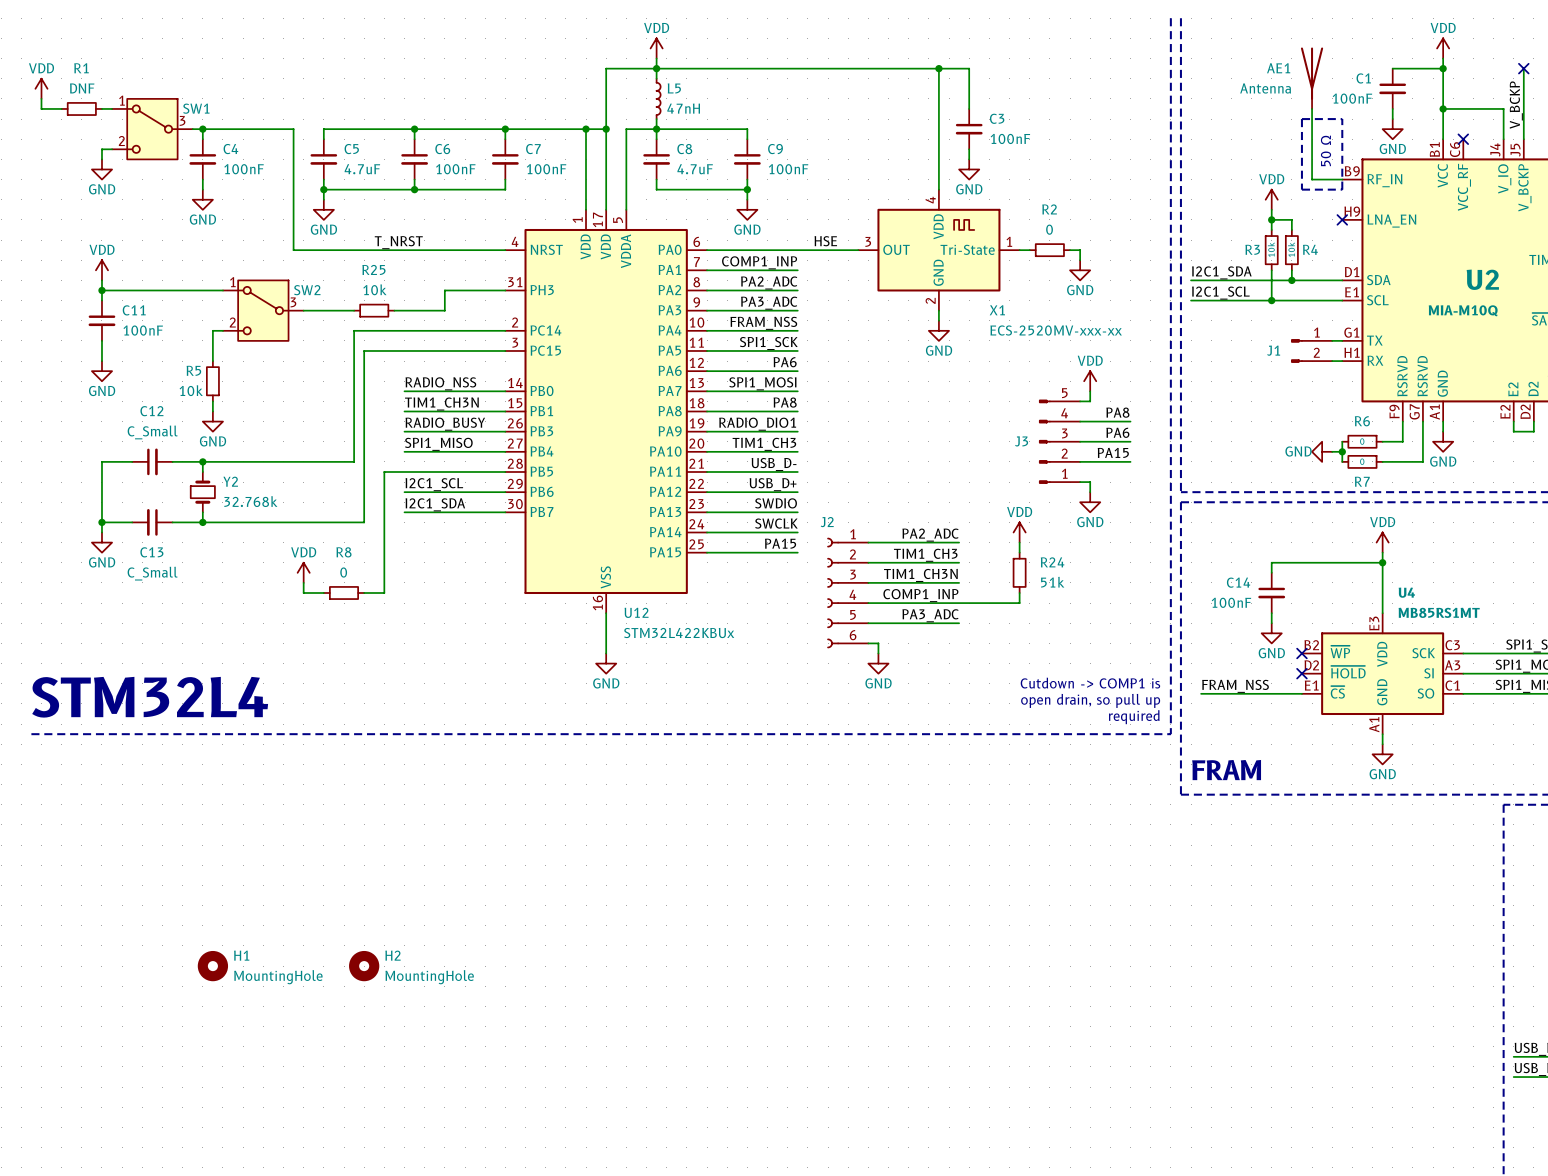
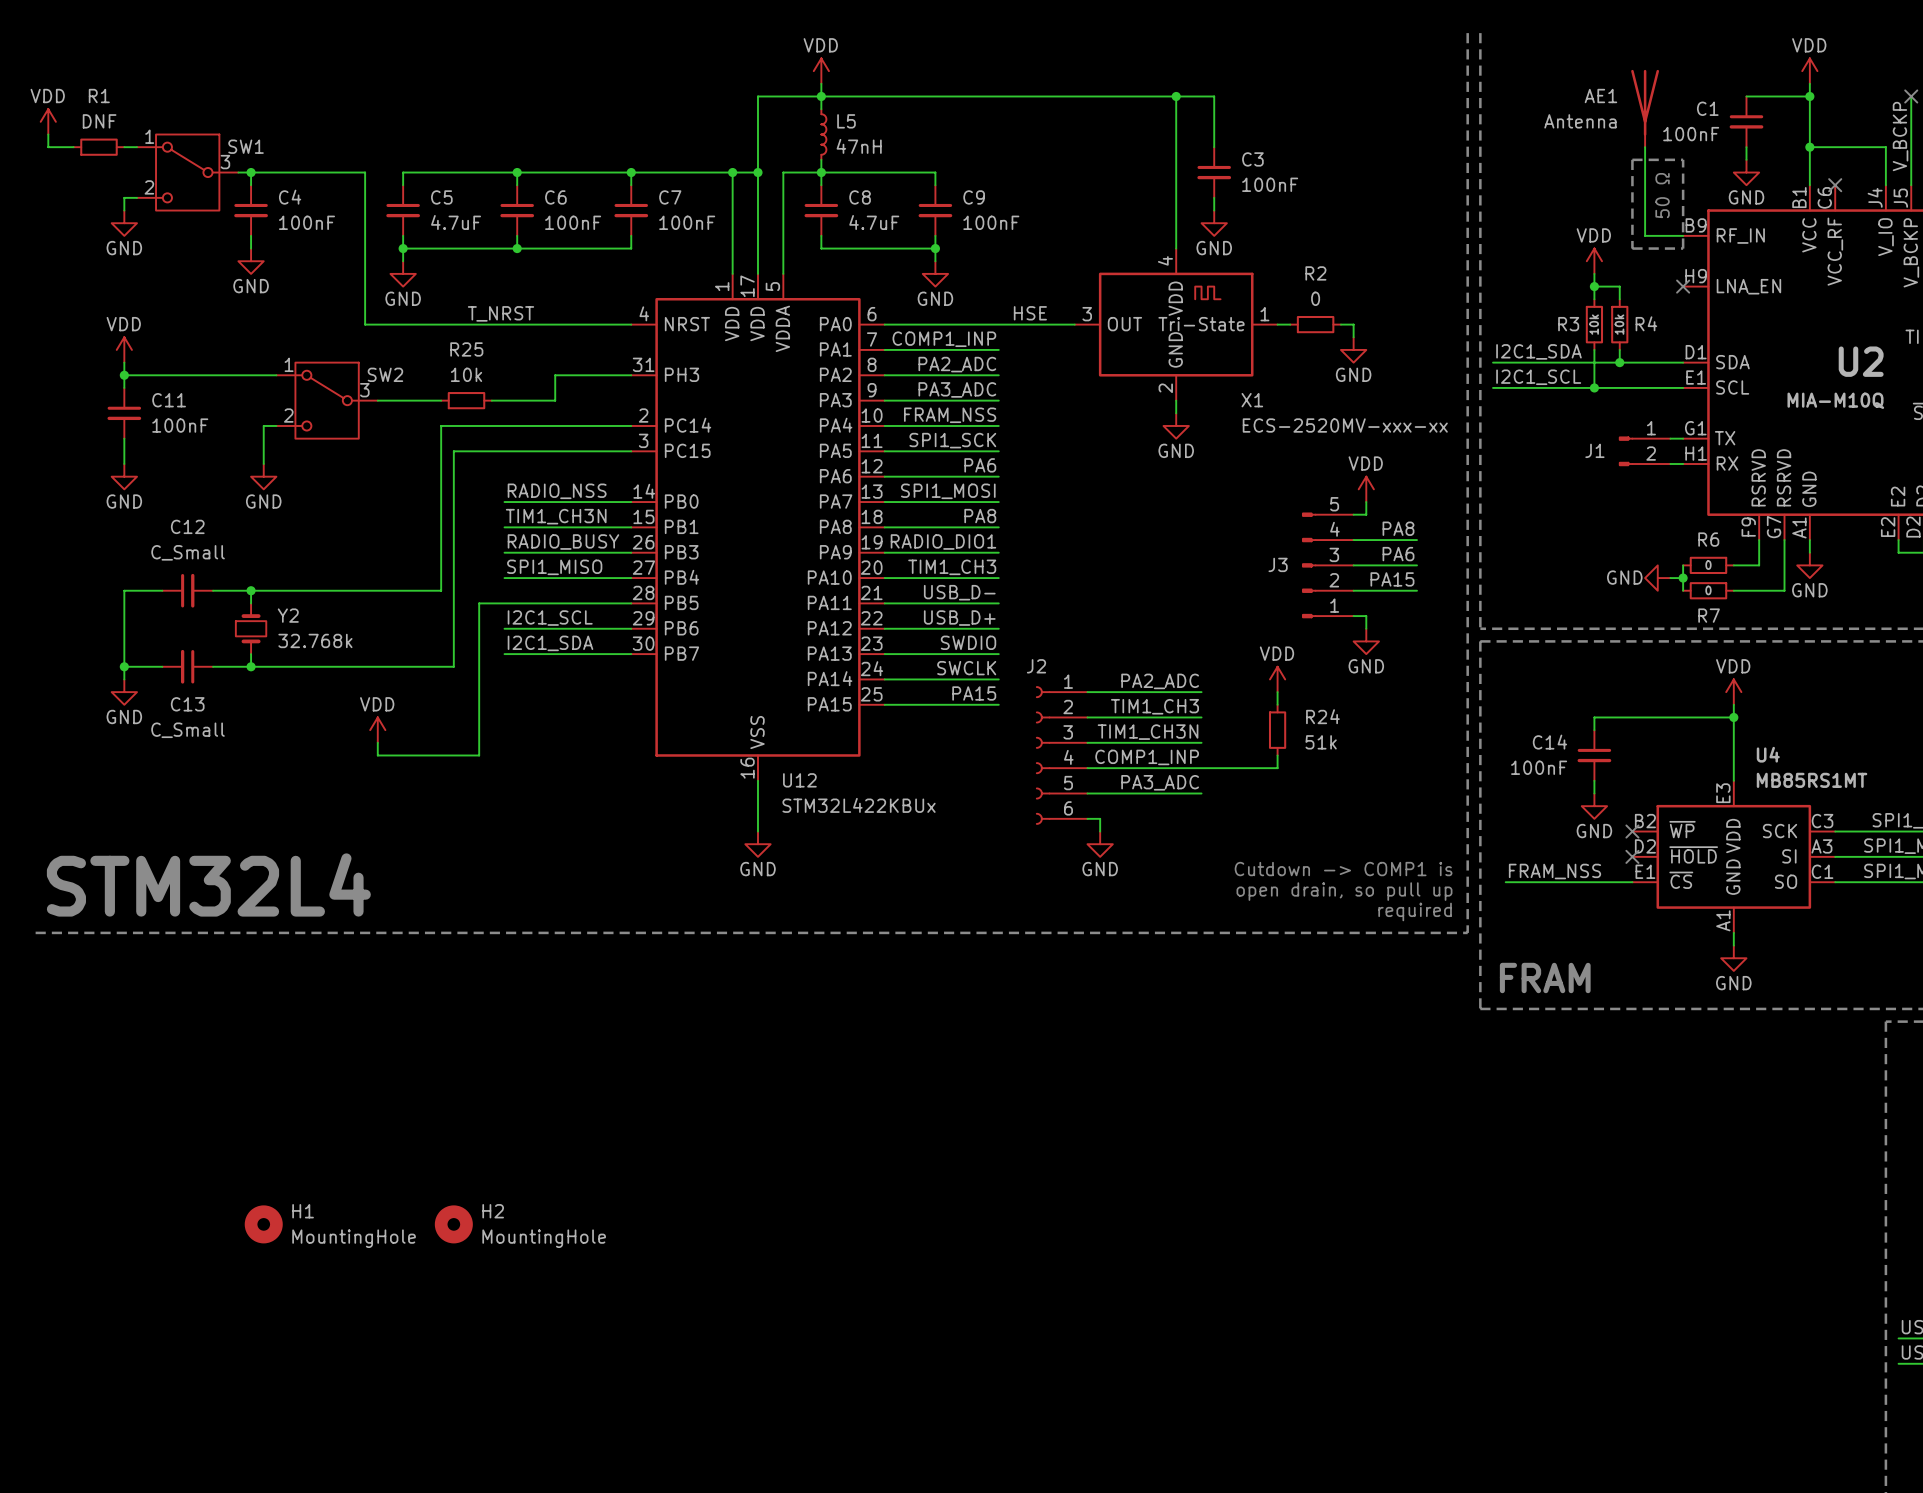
R5: 10k (212, 381) -> none
wire: (212, 401) (212, 411) -> none
power symbol position: GND (212, 421) -> GND (263, 476)
wire: none -> (403, 755) (453, 755)
R8: 0 (344, 593) -> none

